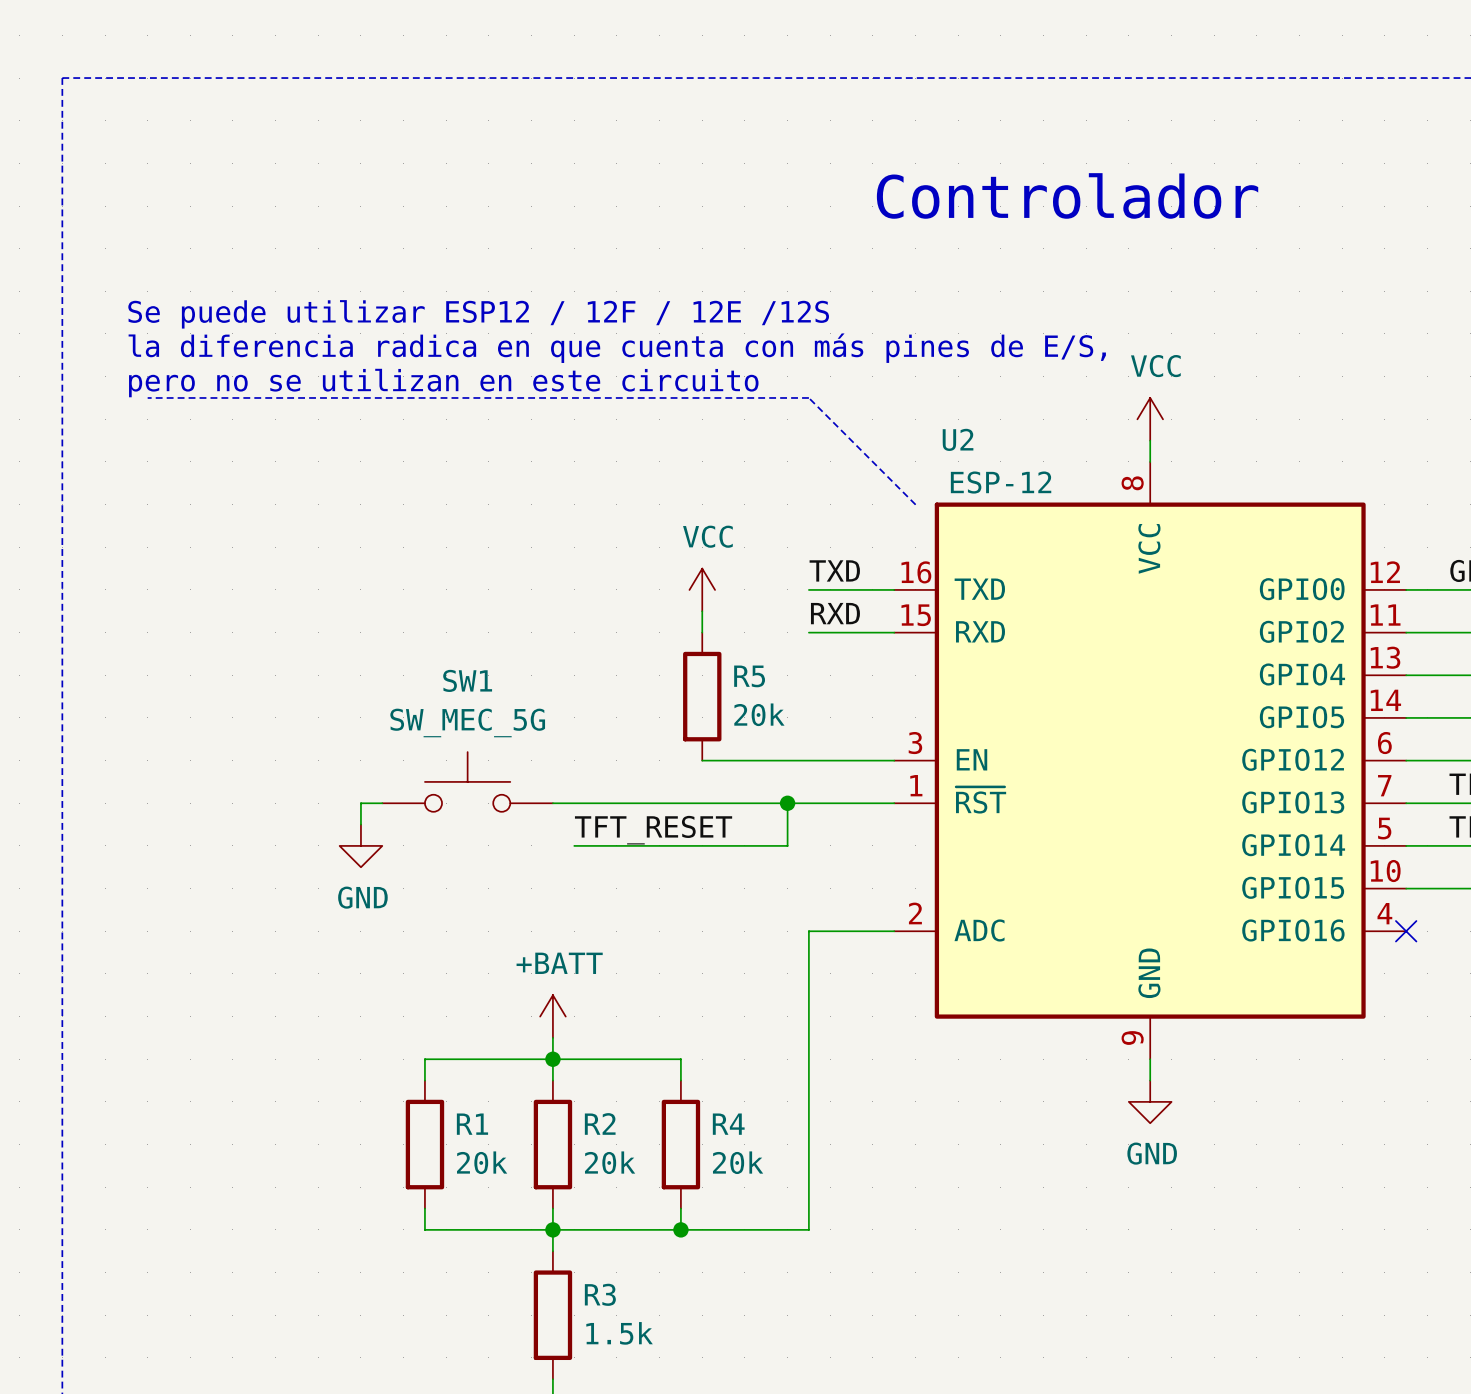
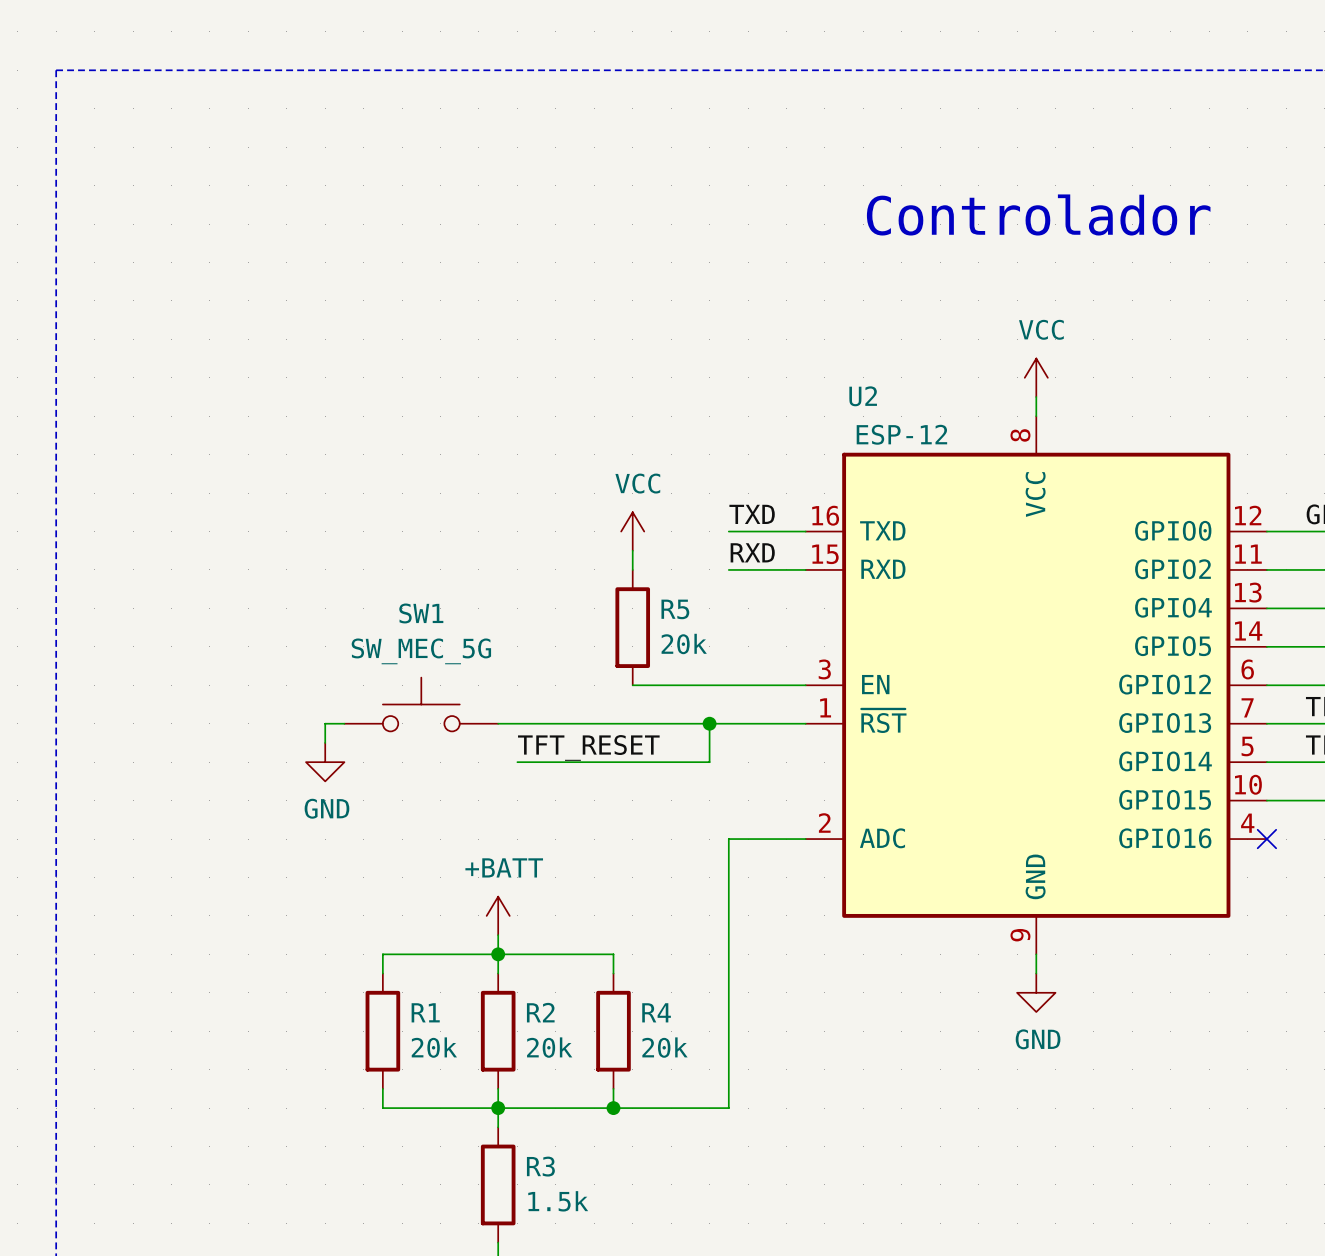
text position: Controlador (1067, 195) -> Controlador (1038, 214)
text: Se puede utilizar ESP12 / 12F / 12E /12S (478, 314) -> none
text: la diferencia radica en que cuenta con más pines de E/S, (617, 348) -> none
text: pero no se utilizan en este circuito (443, 383) -> none
line: (147, 397) (808, 397) (915, 504) -> none

